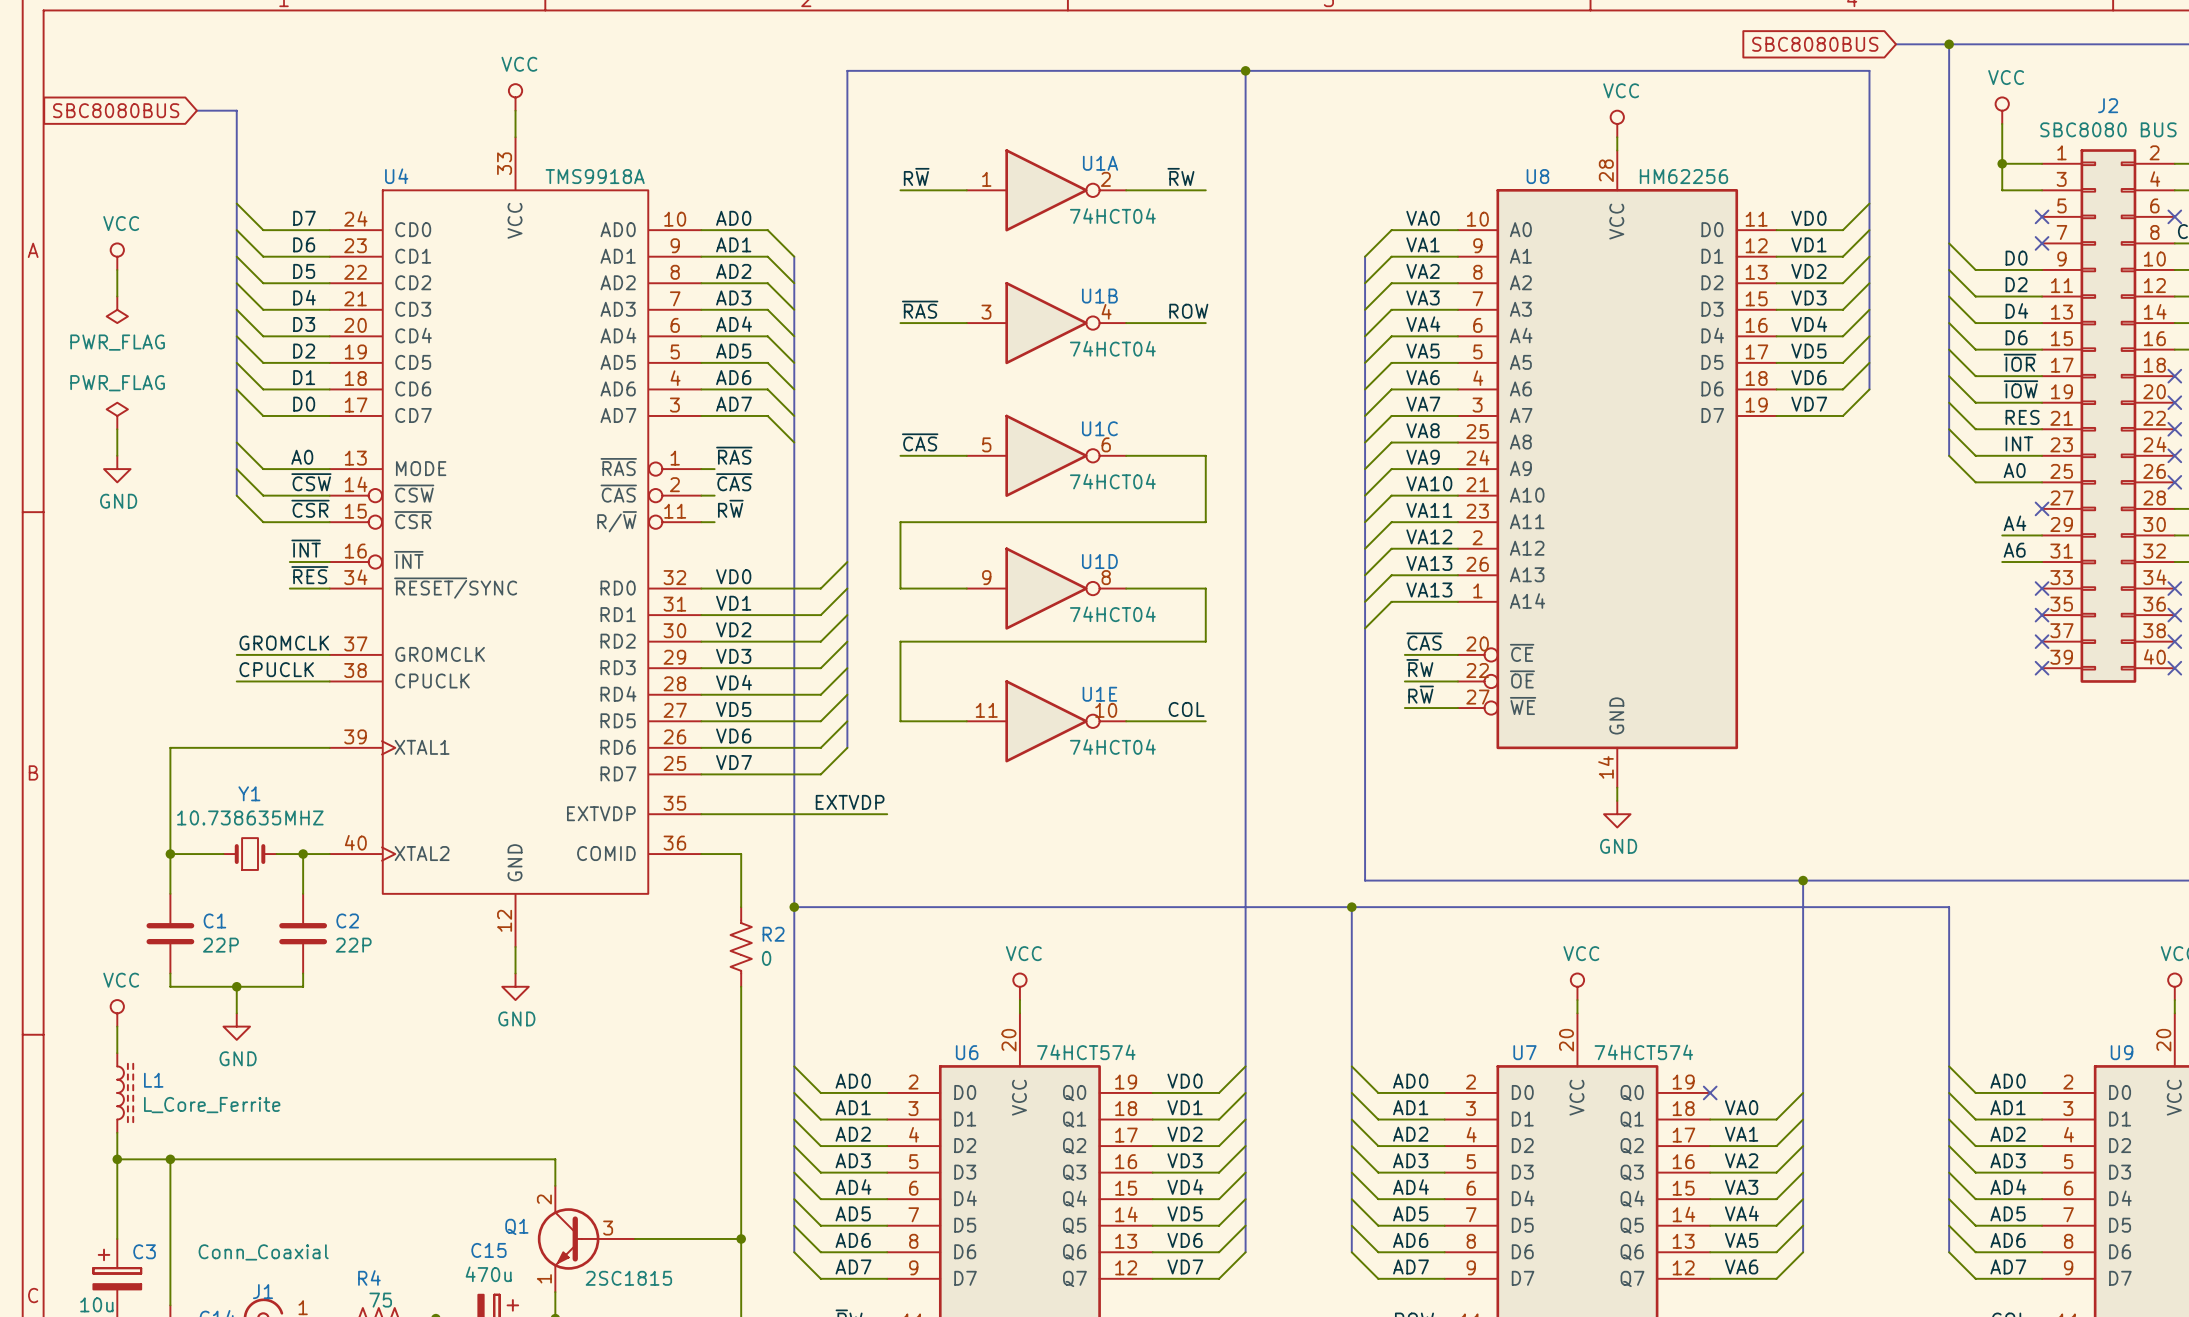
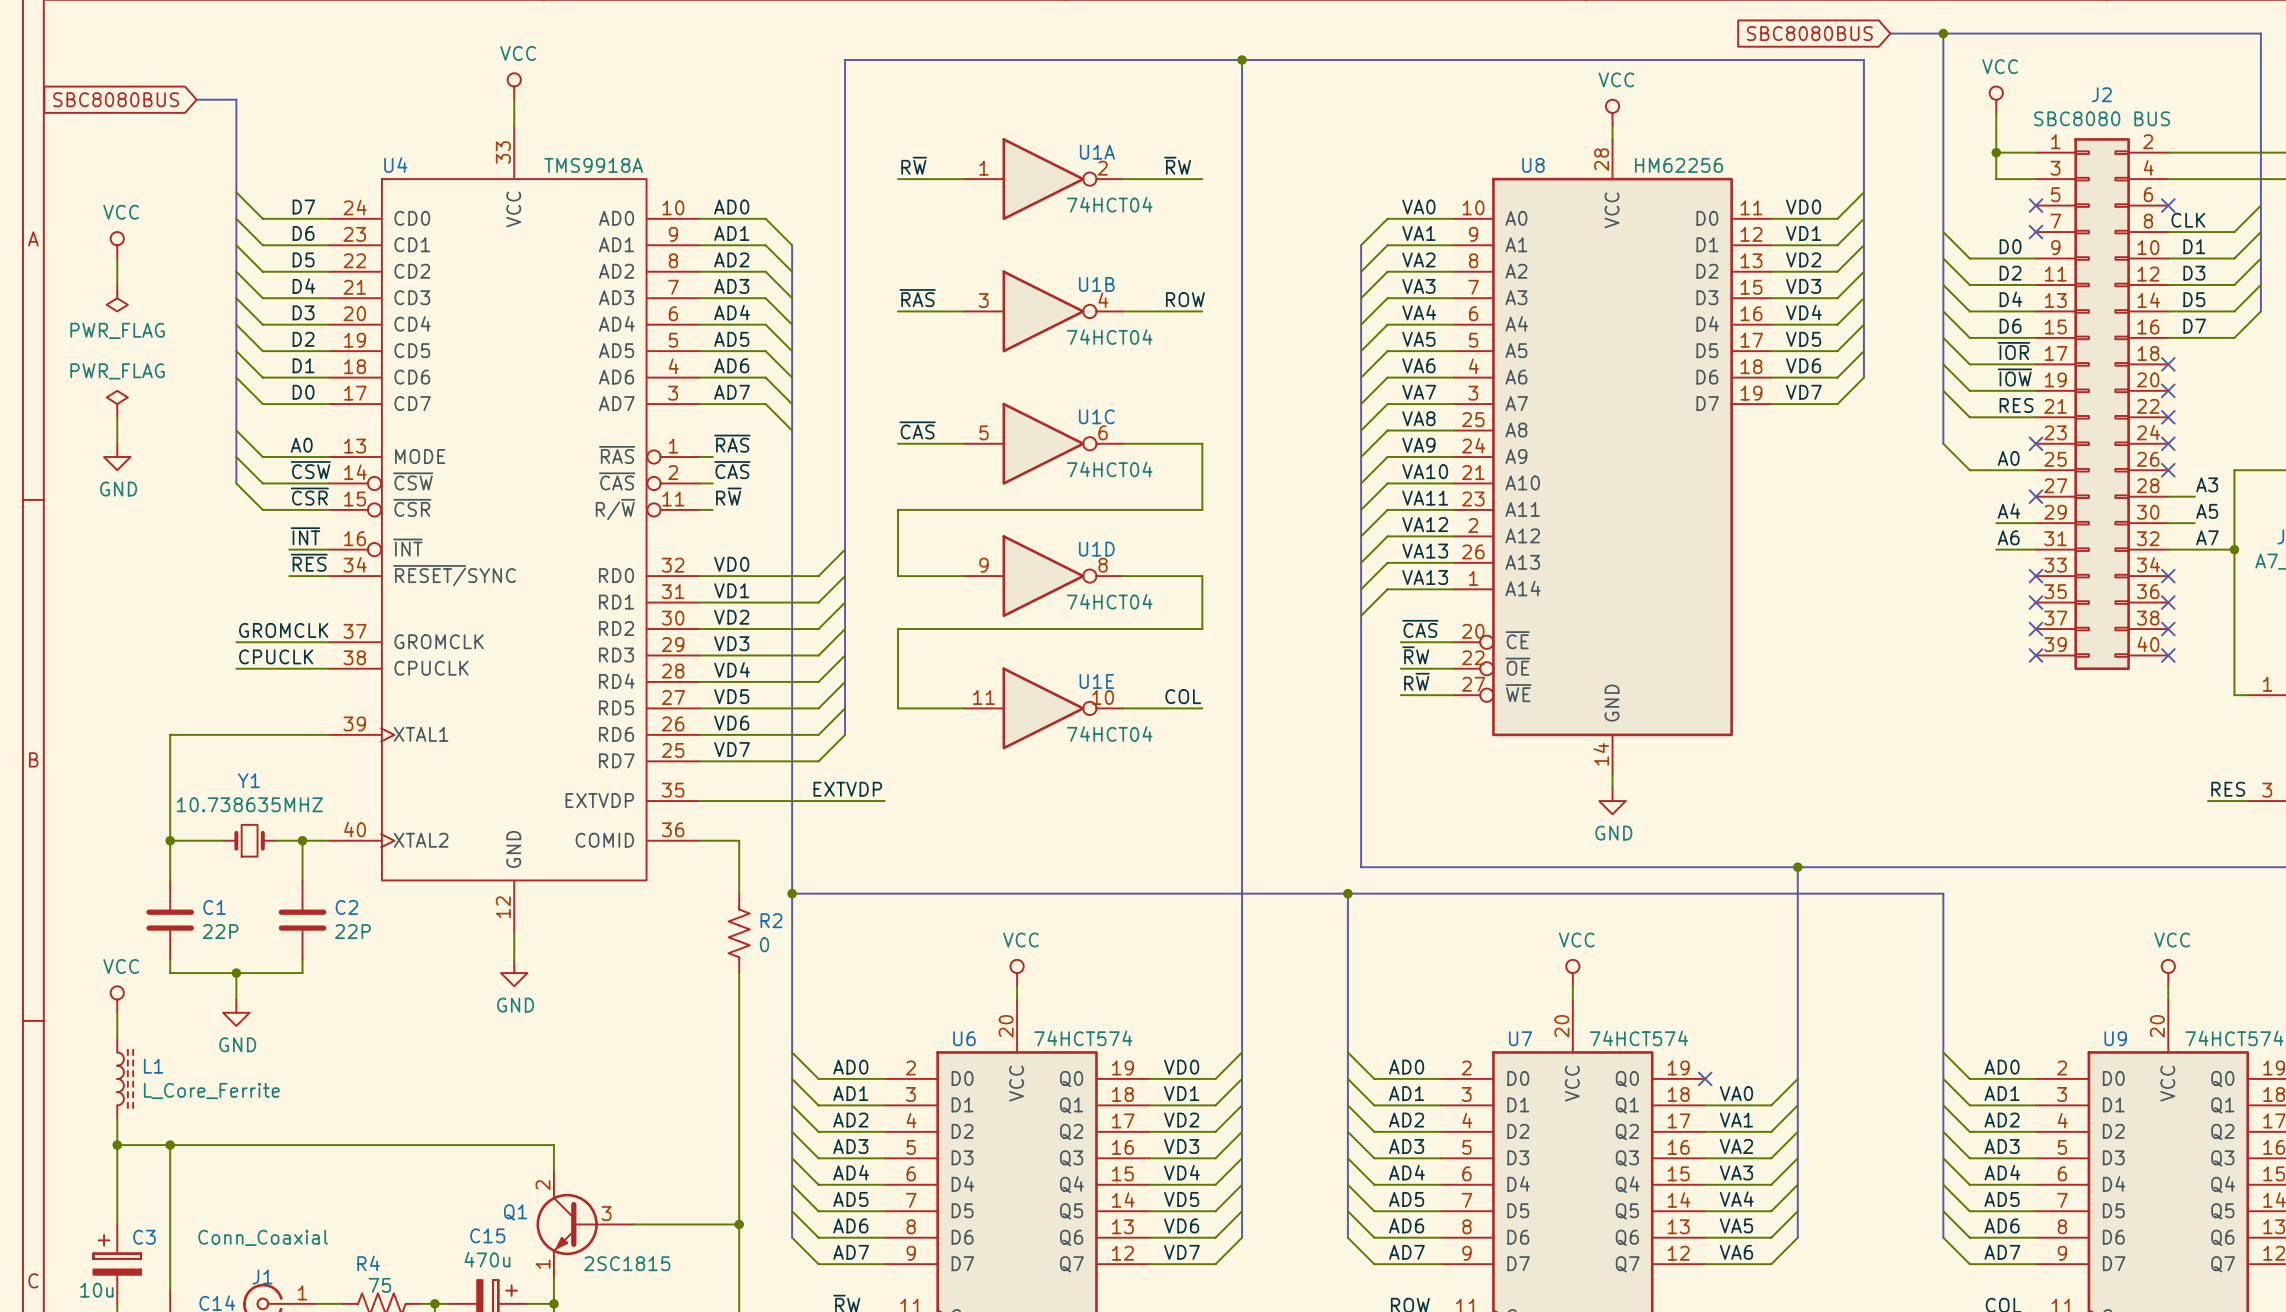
wire: (1949, 429) (1975, 455) (2042, 455) -> none
label: INT (2019, 443) -> none
no-connect mark: none -> (2035, 443)

